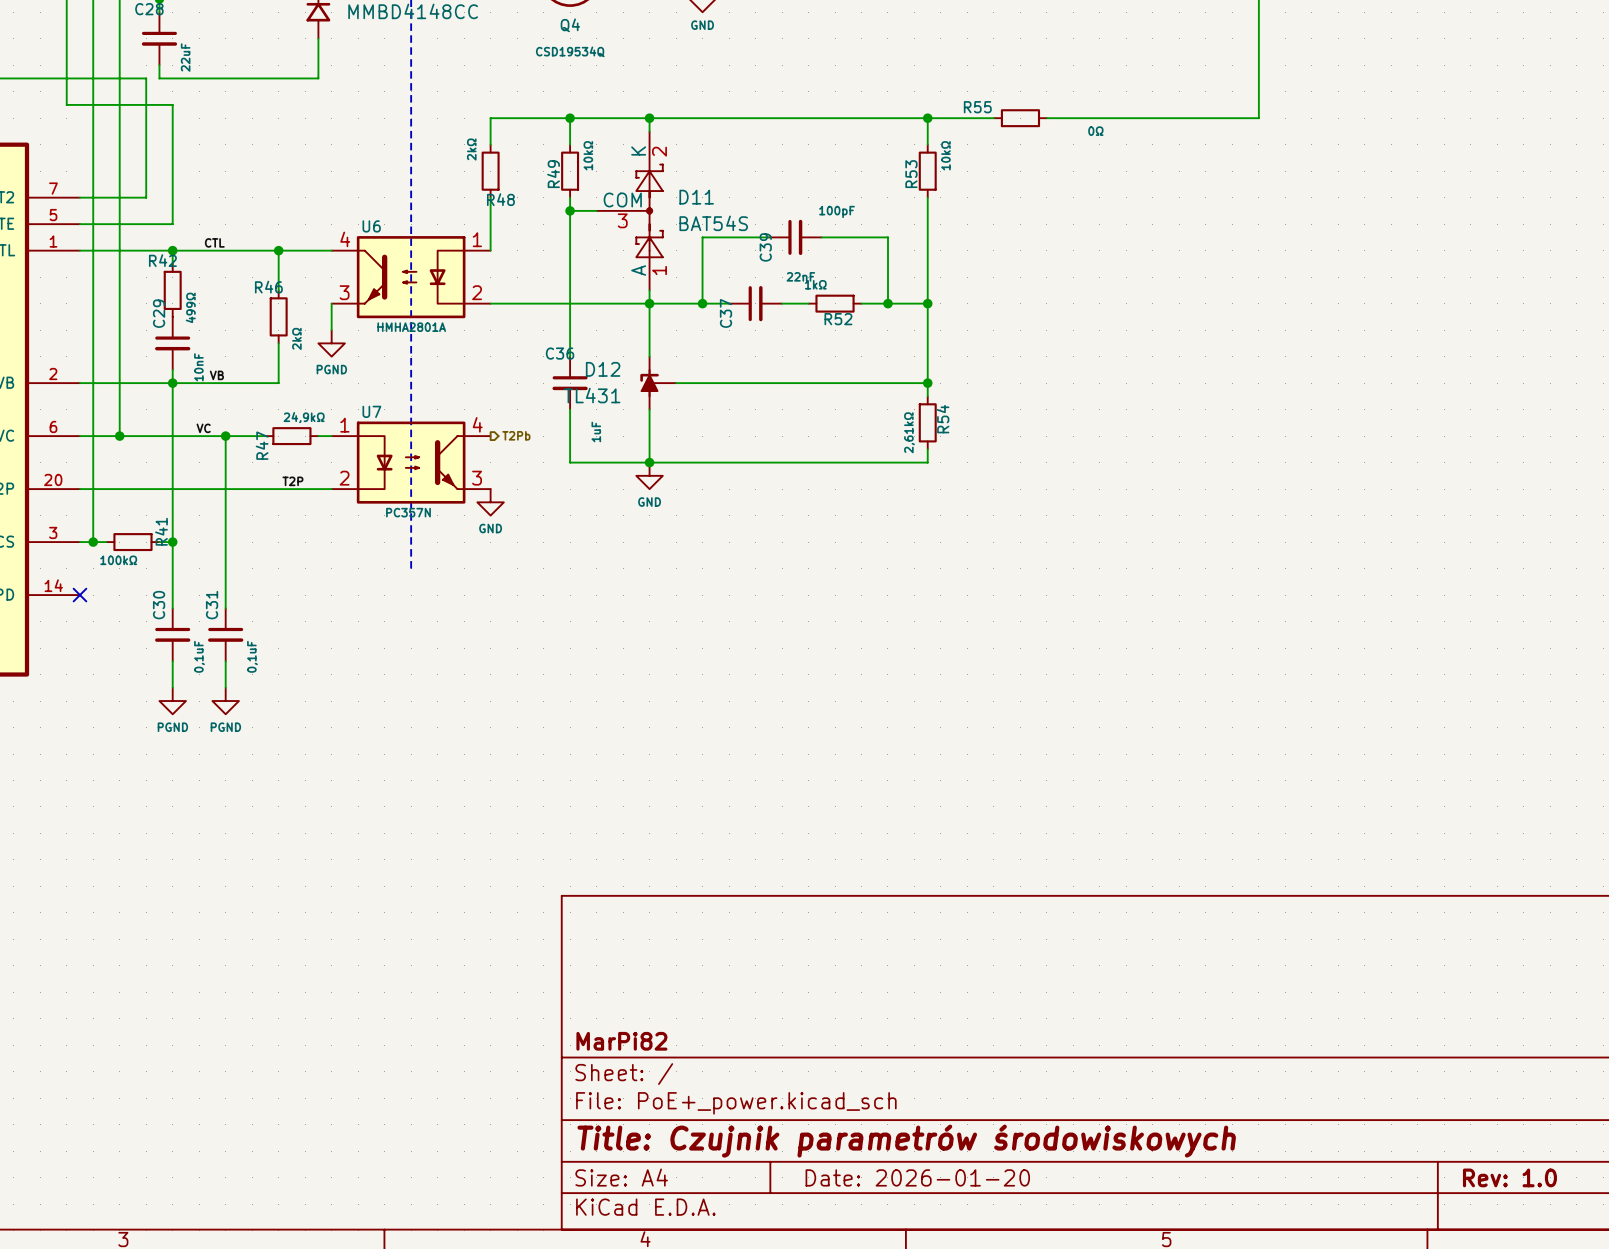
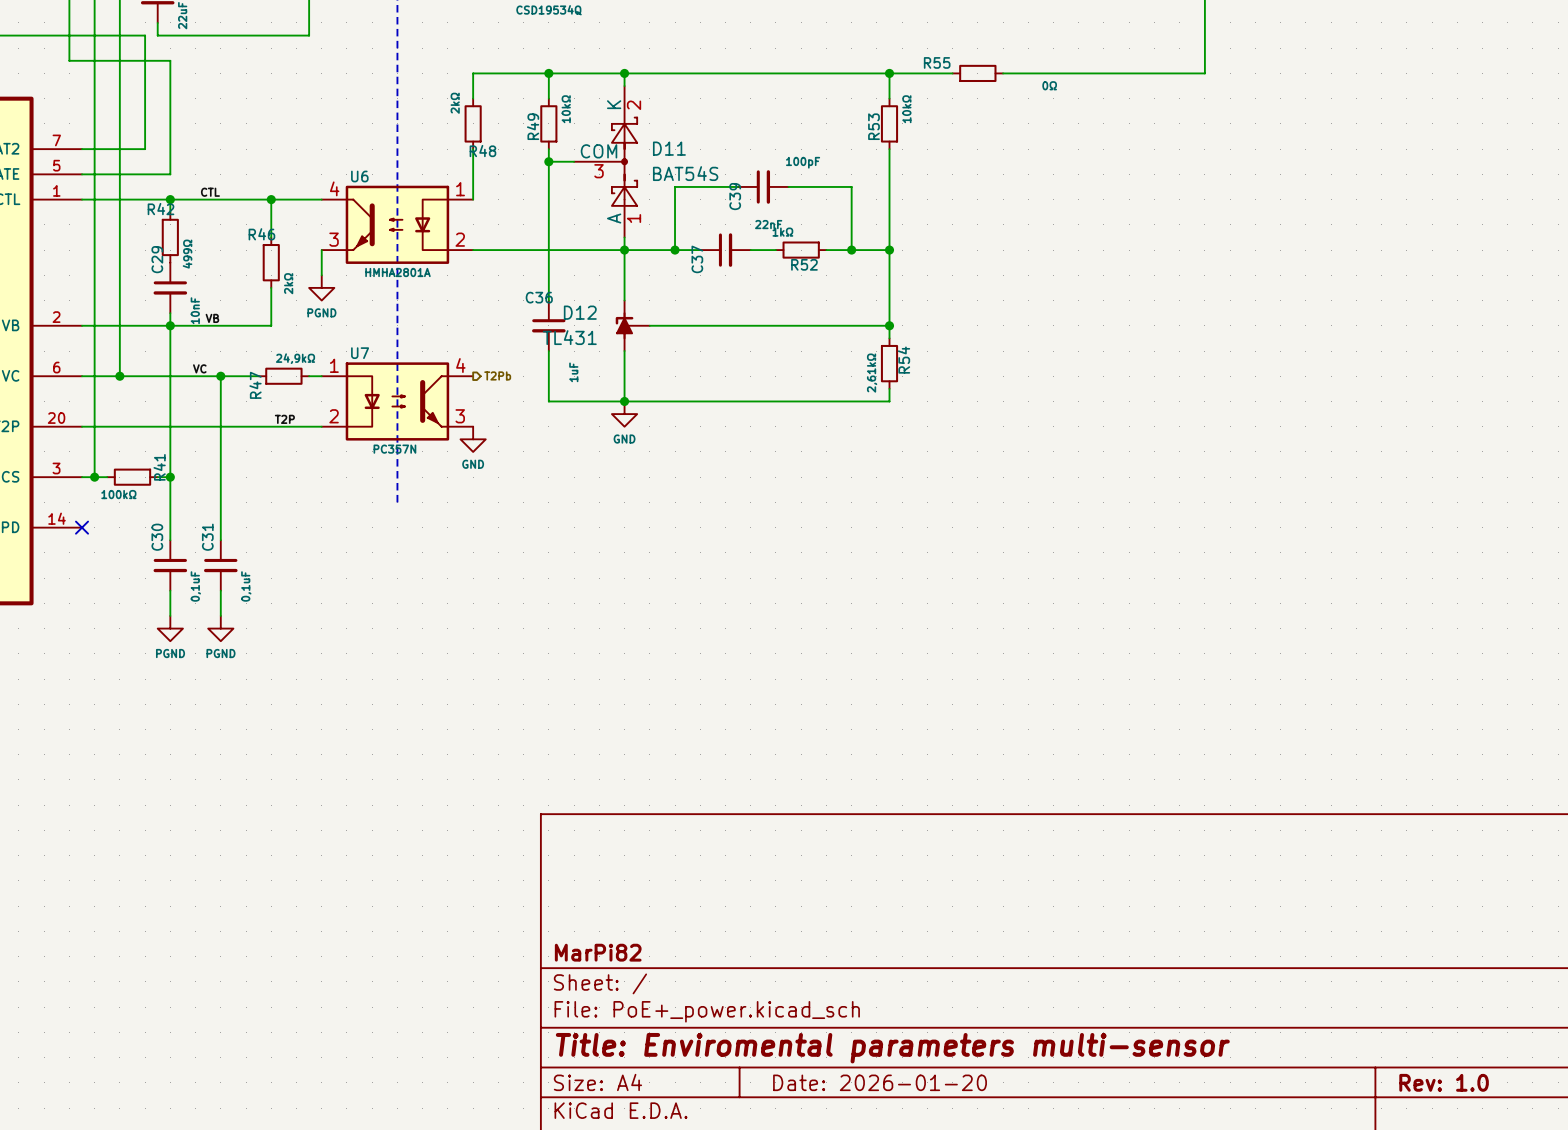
title block: Title: Czujnik parametrów środowiskowych (906, 1141) -> Title: Enviromental parameters multi-sensor (892, 1048)

